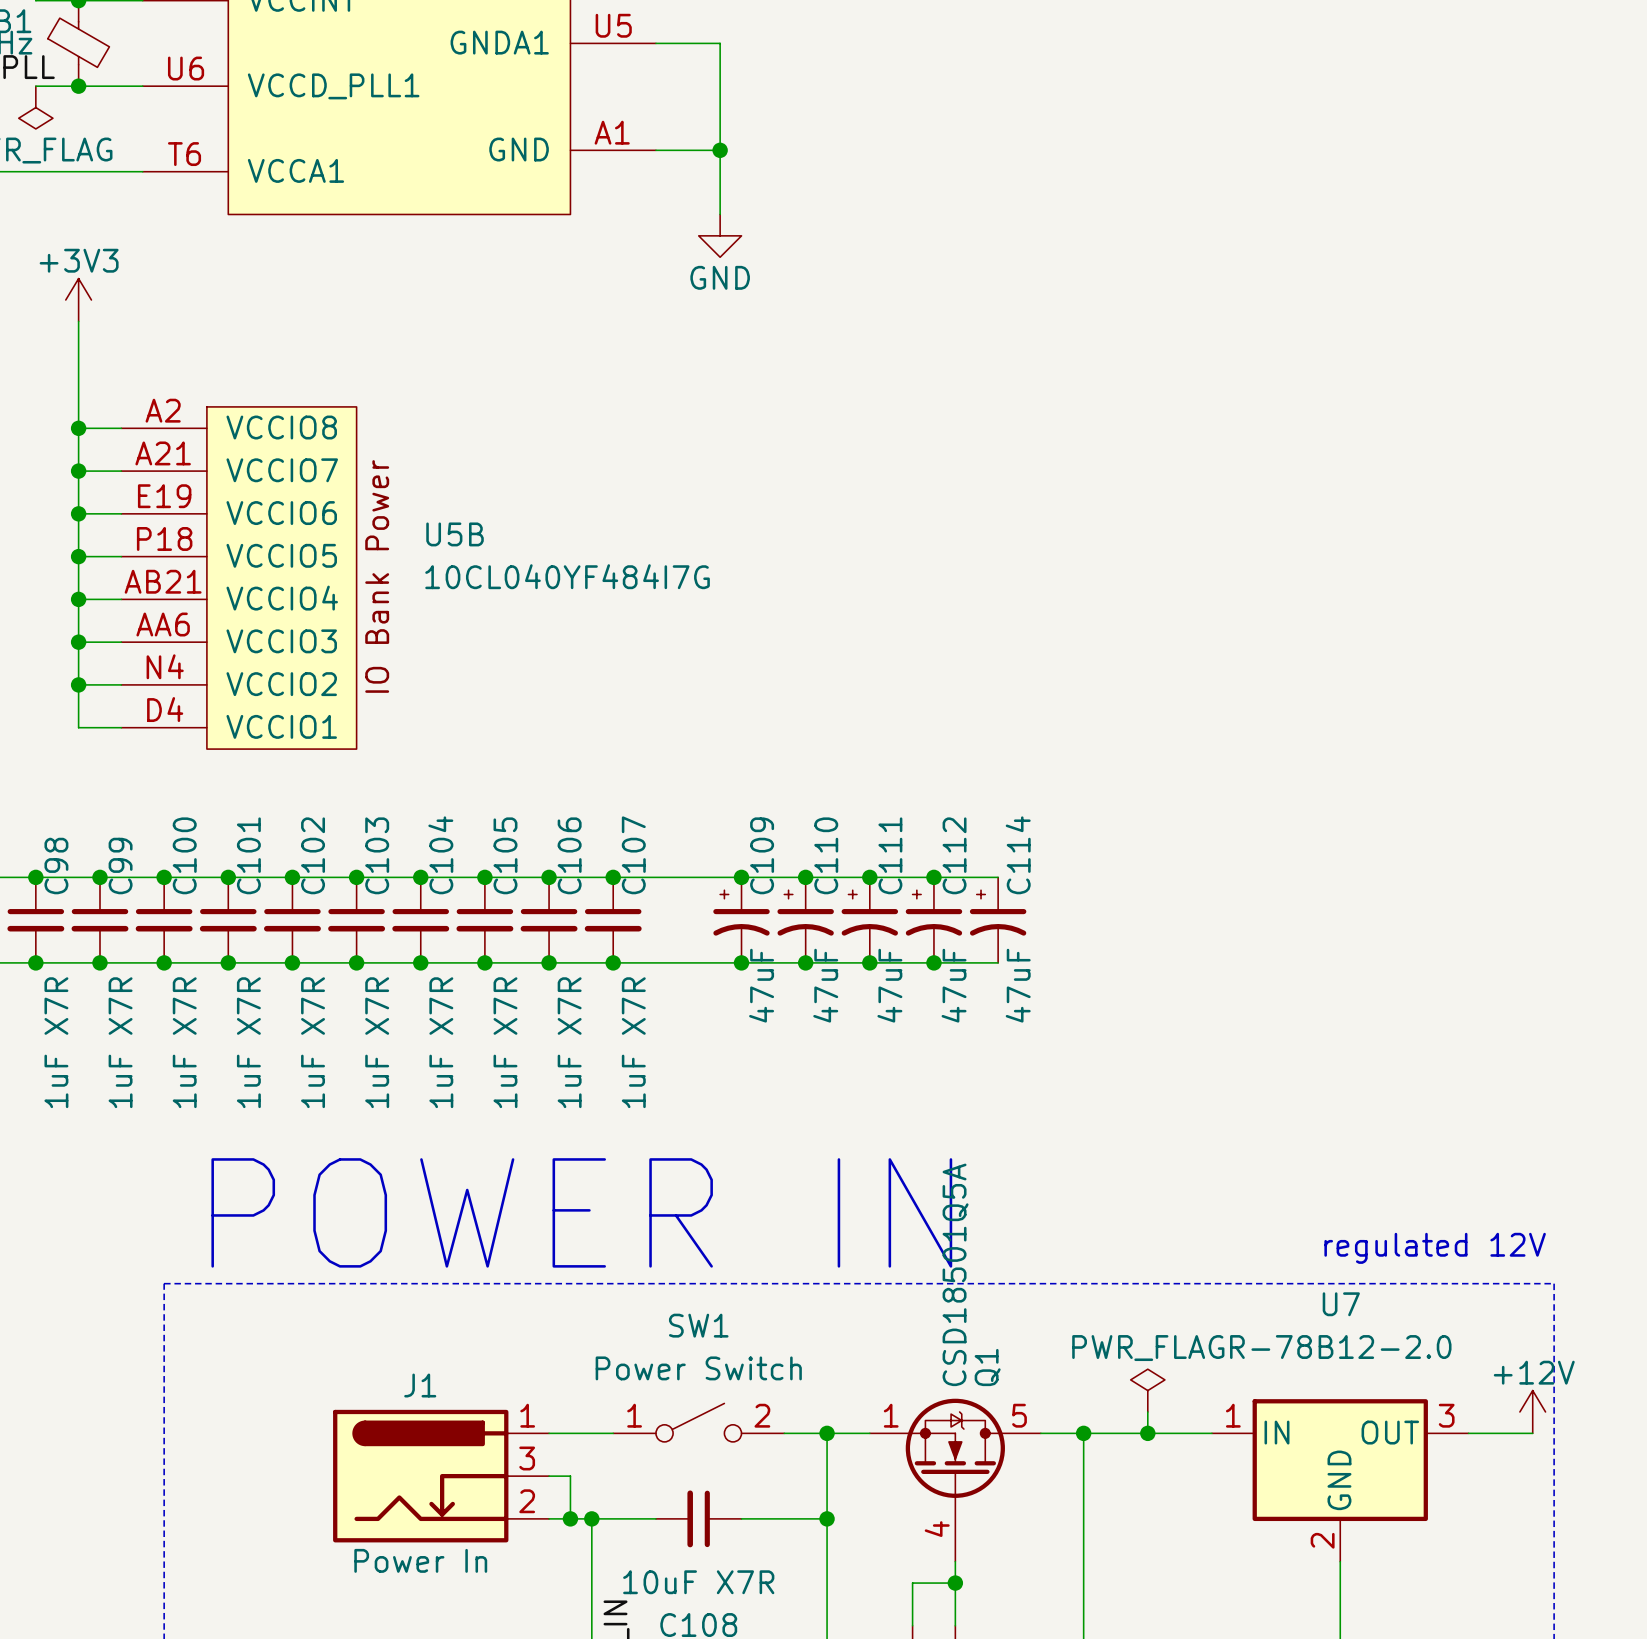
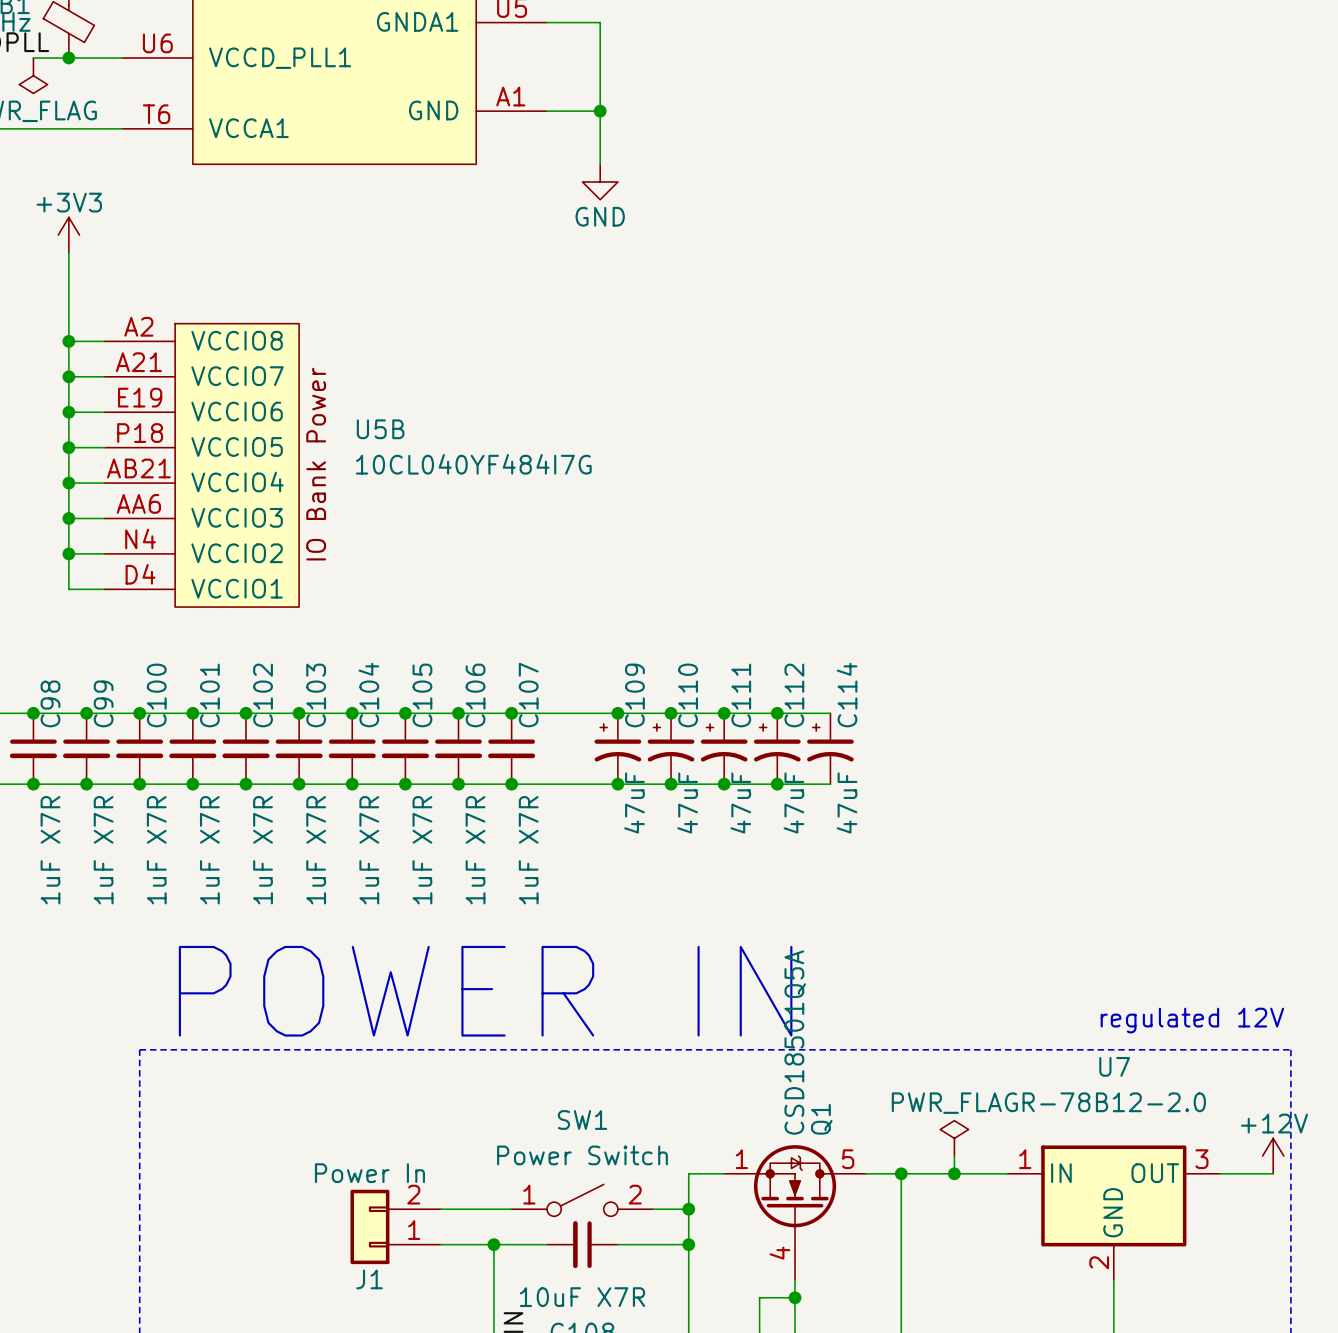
J1 name position: J1 (420, 1385) -> J1 (369, 1279)
J1 symbol: [333, 1409, 550, 1543] -> [350, 1189, 441, 1265]
SW1 position: (698, 1422) -> (582, 1200)
wire: (549, 1433) (613, 1433) -> none
wire: (784, 1433) (827, 1433) -> (653, 1209) (688, 1209)
junction position: (827, 1433) -> (688, 1209)
wire: (570, 1476) (570, 1518) -> (476, 1209) (511, 1209)
junction: (570, 1518) -> none
J1 value position: Power In (420, 1560) -> Power In (369, 1173)

